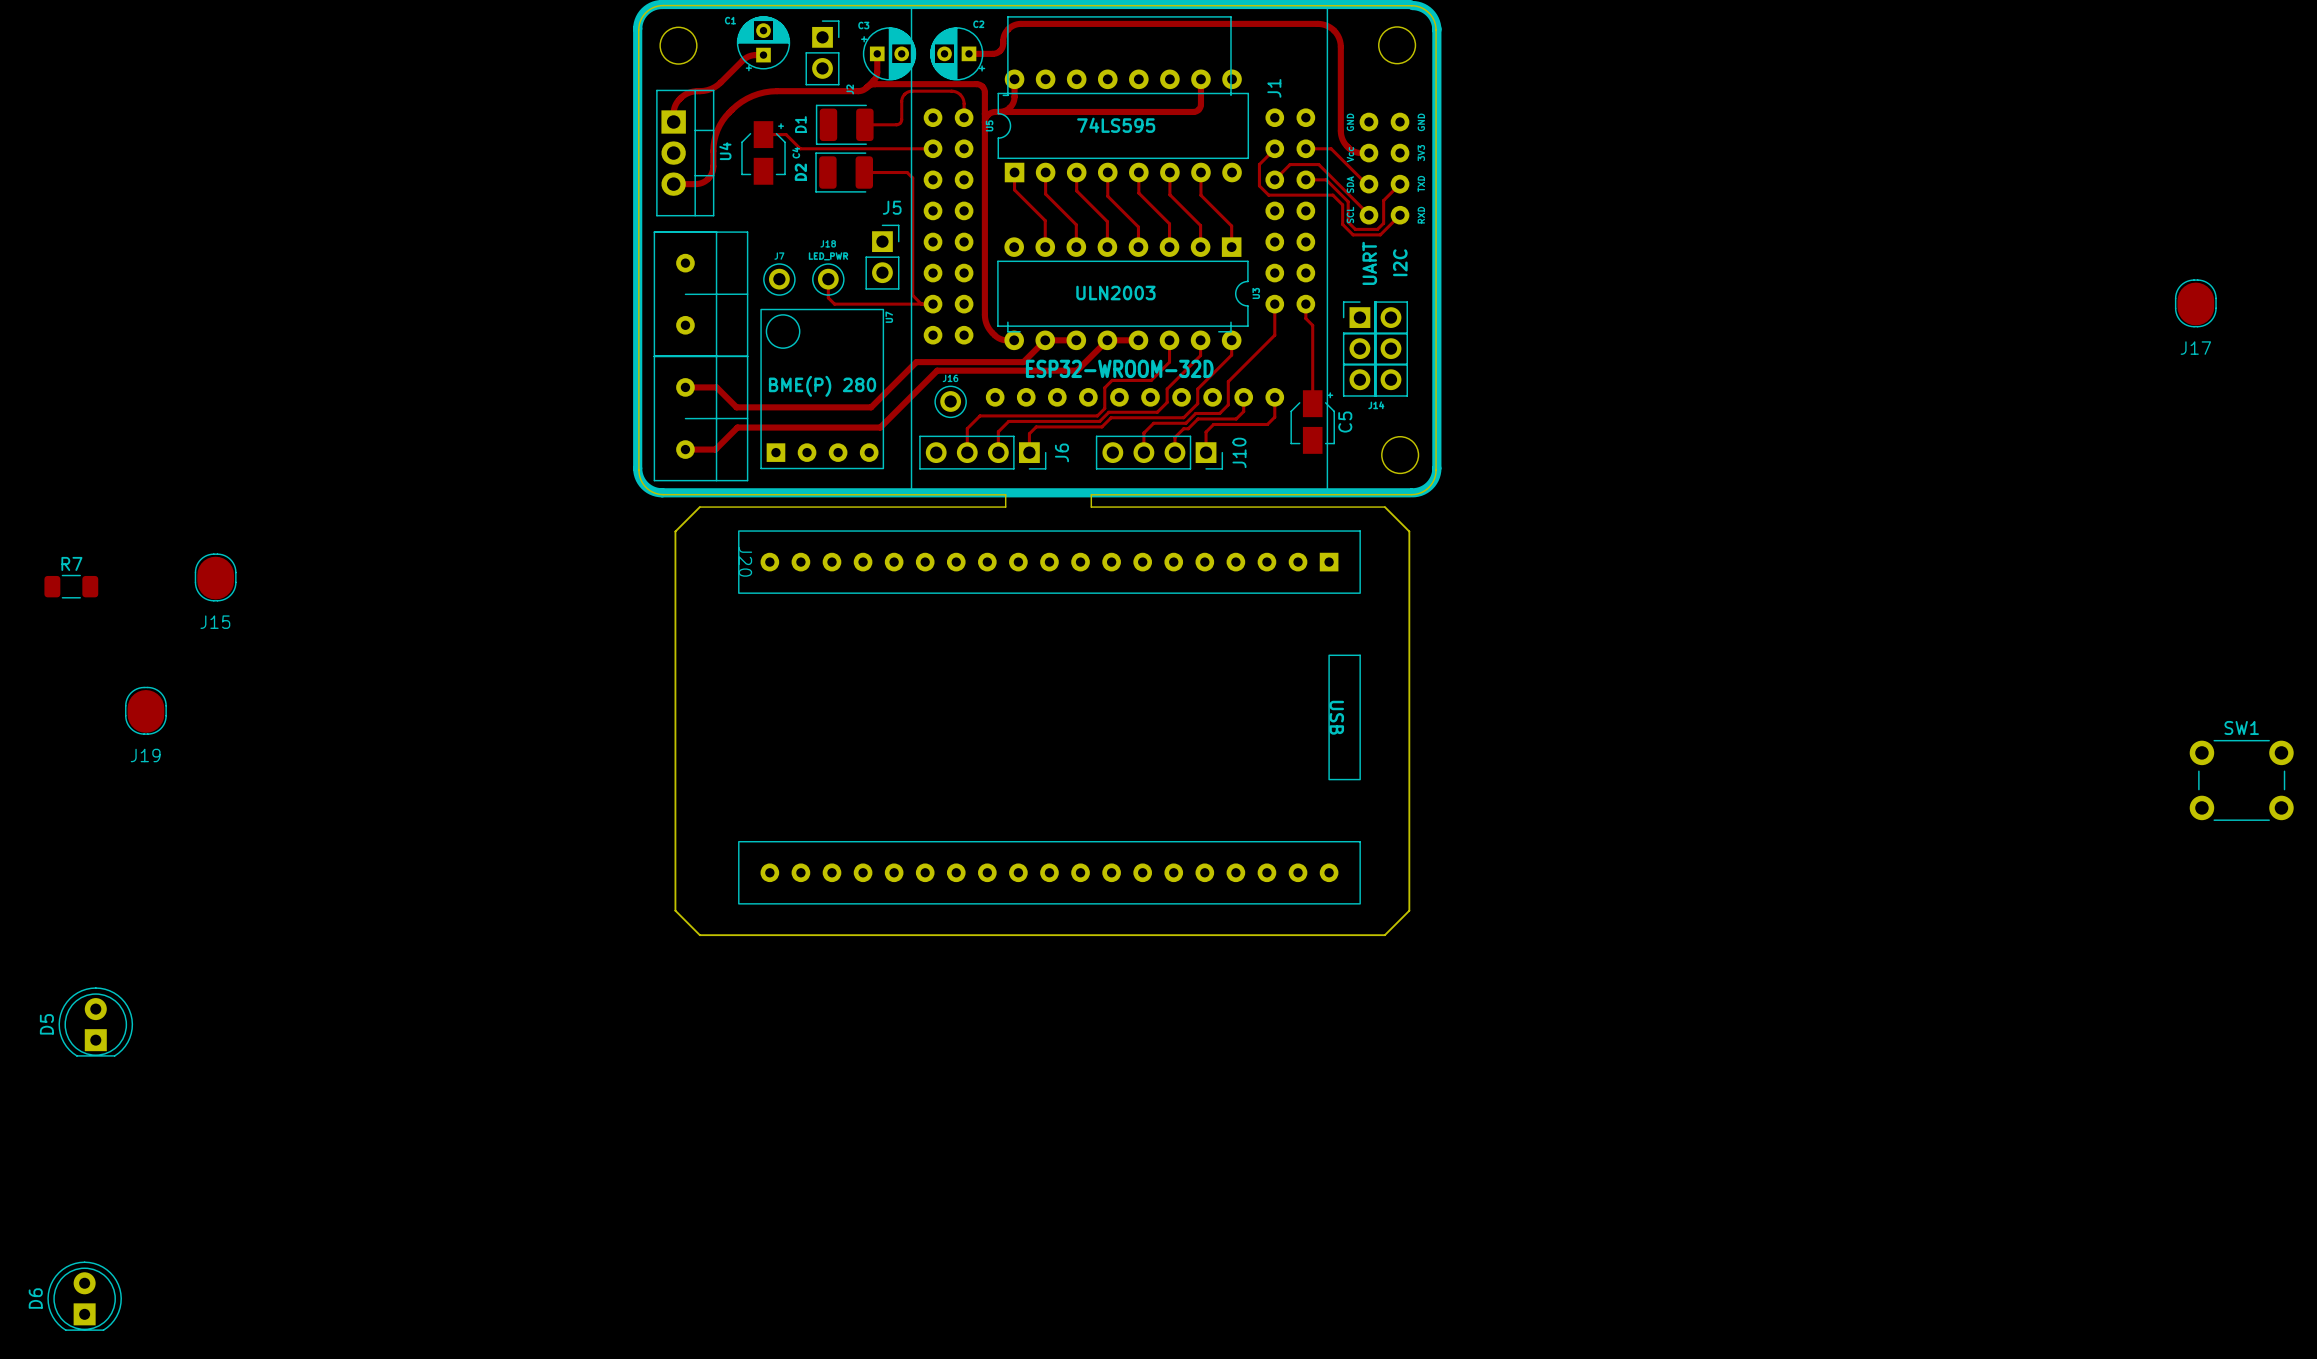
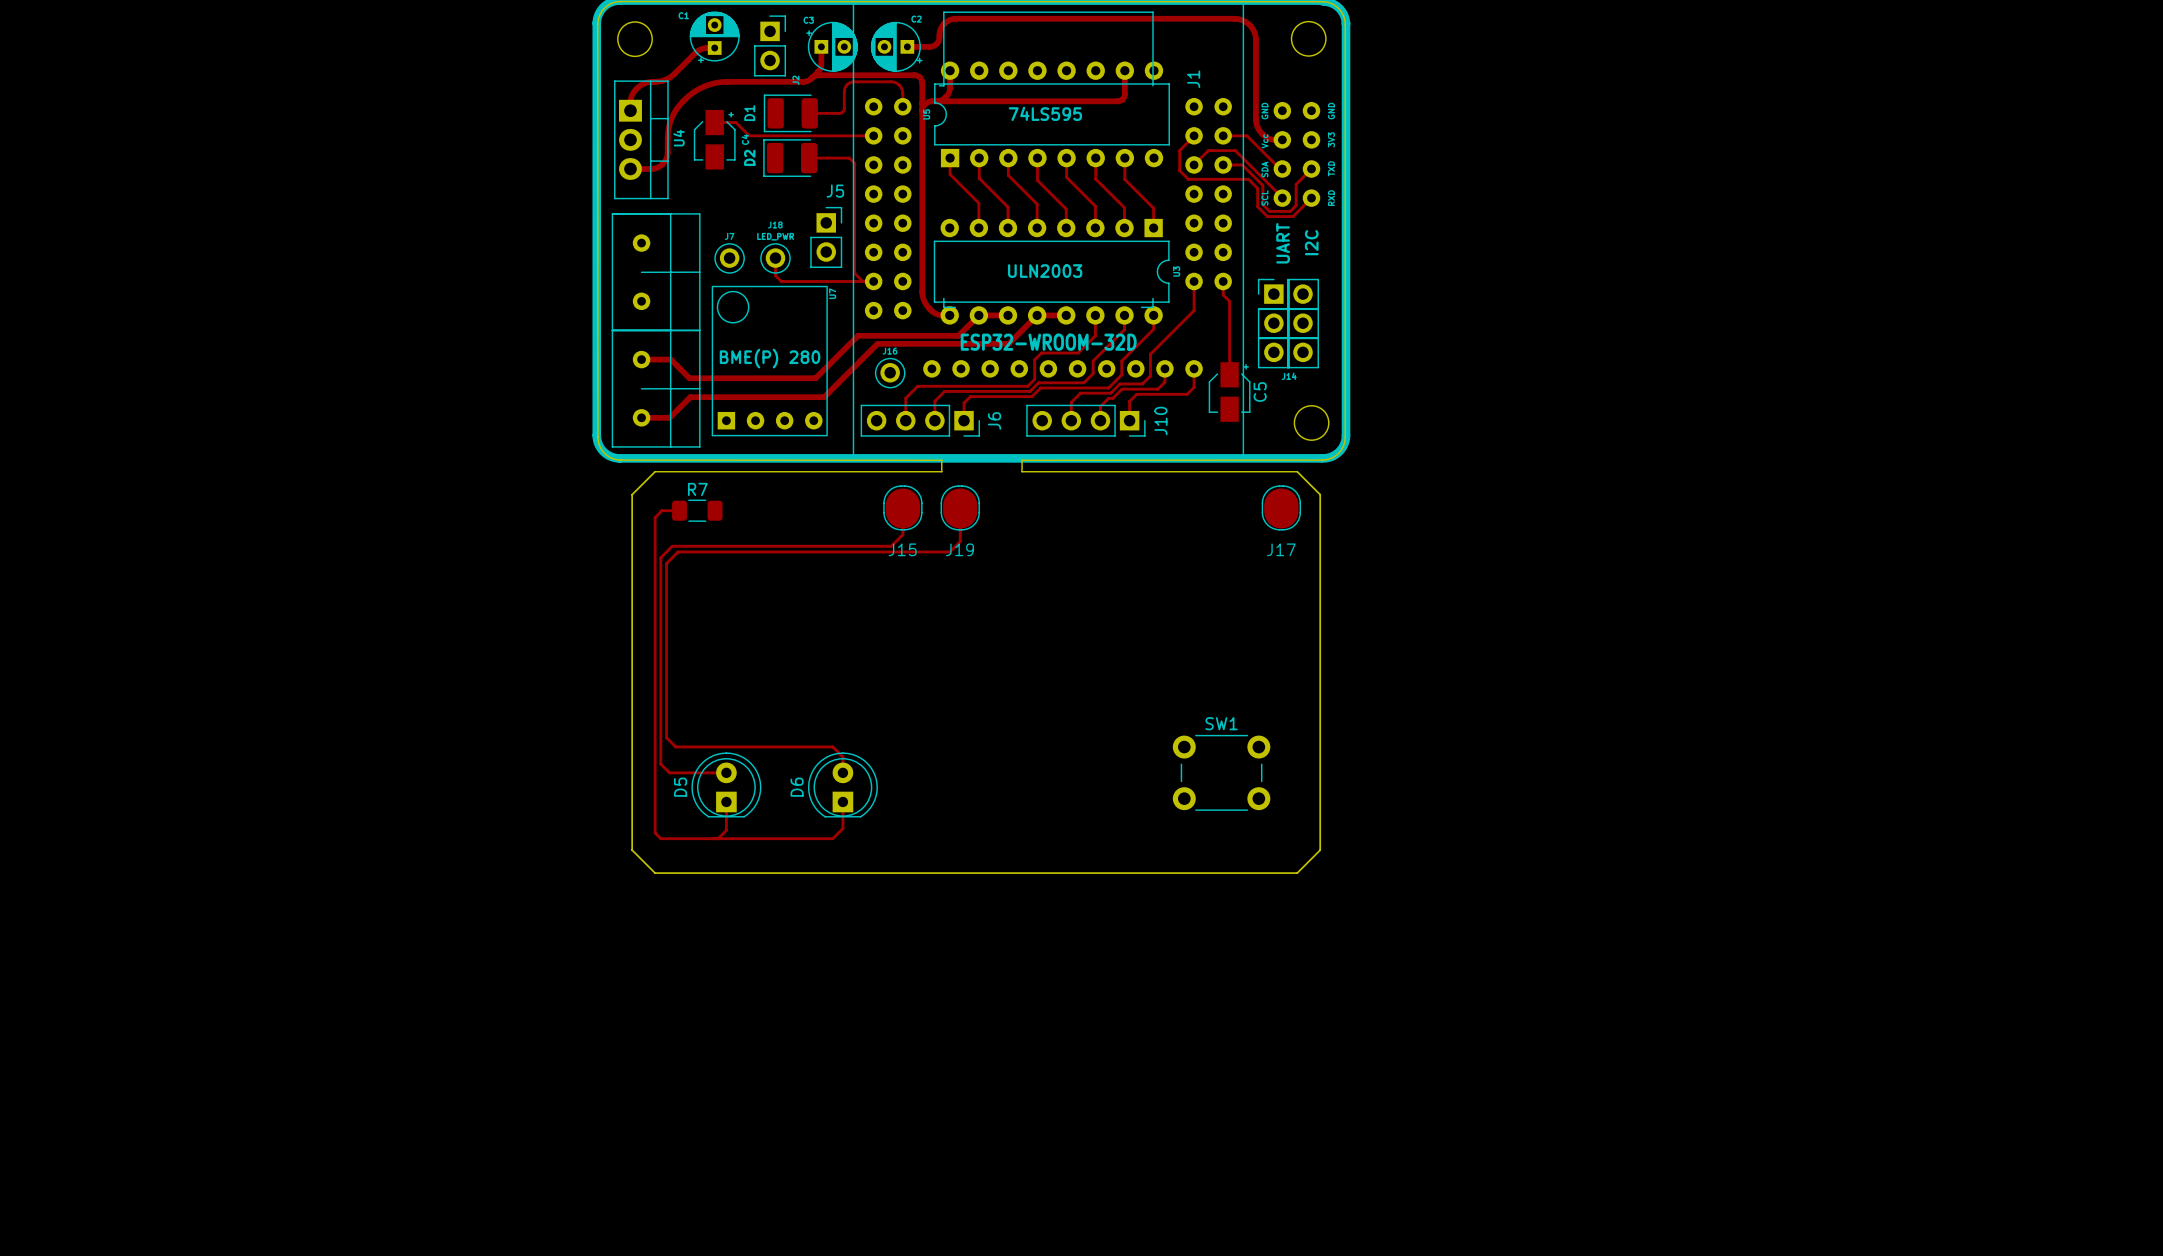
J17 position: (2195, 303) -> (1281, 507)
track: none -> (902, 508) (902, 534) (891, 546) (672, 546) (660, 557) (660, 764) (669, 772) (726, 772)
track: none -> (960, 508) (960, 541) (949, 551) (678, 551) (666, 563) (666, 737) (675, 746) (832, 746) (842, 757) (842, 772)
track: none -> (679, 510) (661, 510) (655, 517) (655, 832) (660, 838) (832, 838) (842, 828) (842, 801)
J15 position: (215, 577) -> (902, 507)
R7 position: (71, 586) -> (697, 510)
J19 position: (145, 710) -> (960, 507)
J20: (1049, 717) -> none
SW1 position: (2241, 780) -> (1221, 772)
track: none -> (726, 801) (726, 830) (718, 838)
D5 position: (95, 1021) -> (726, 784)
D6 position: (84, 1296) -> (842, 784)

